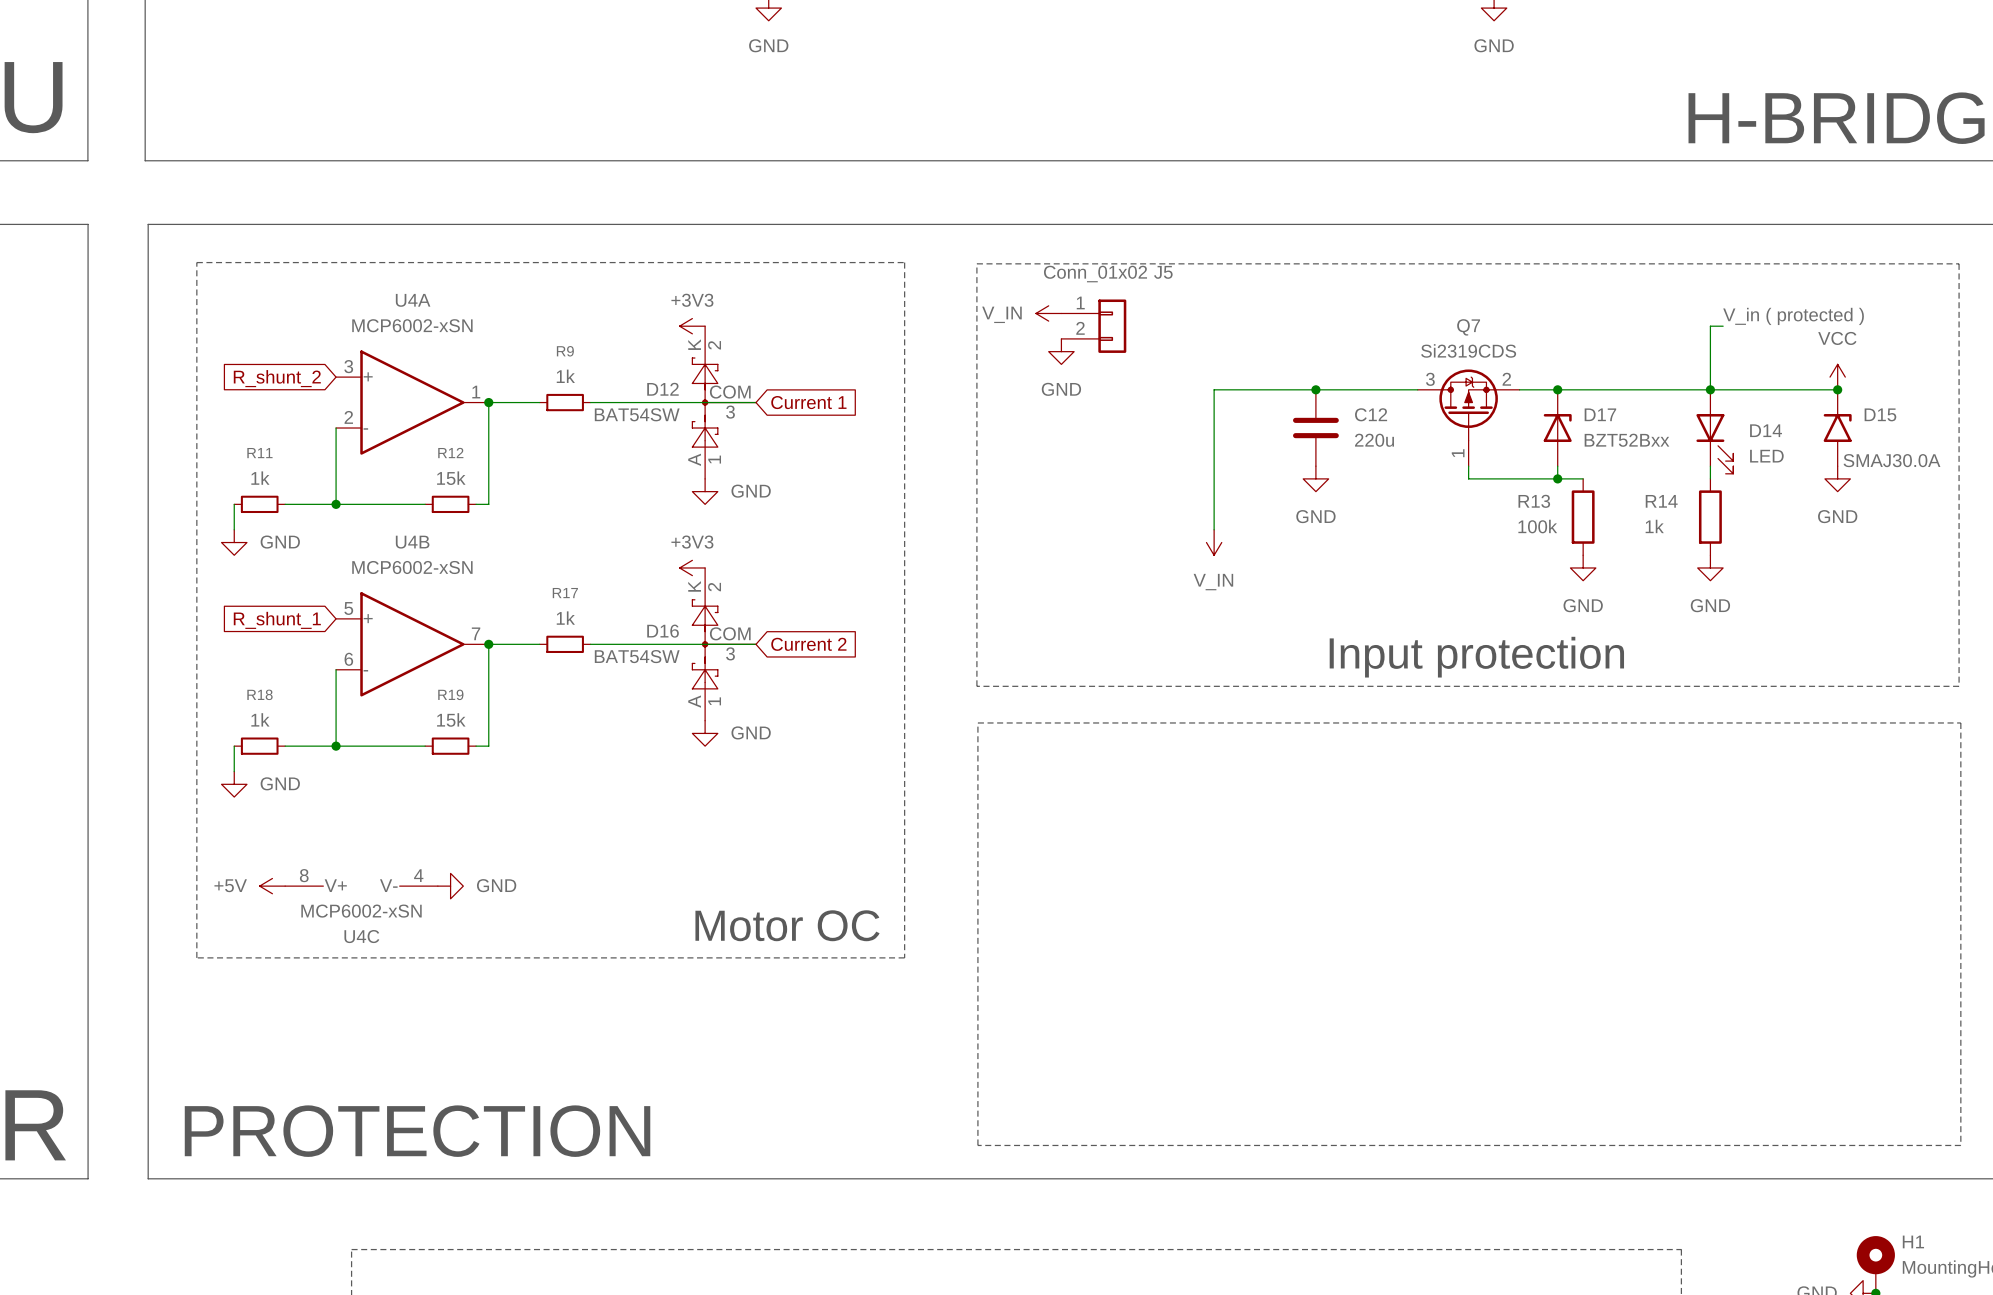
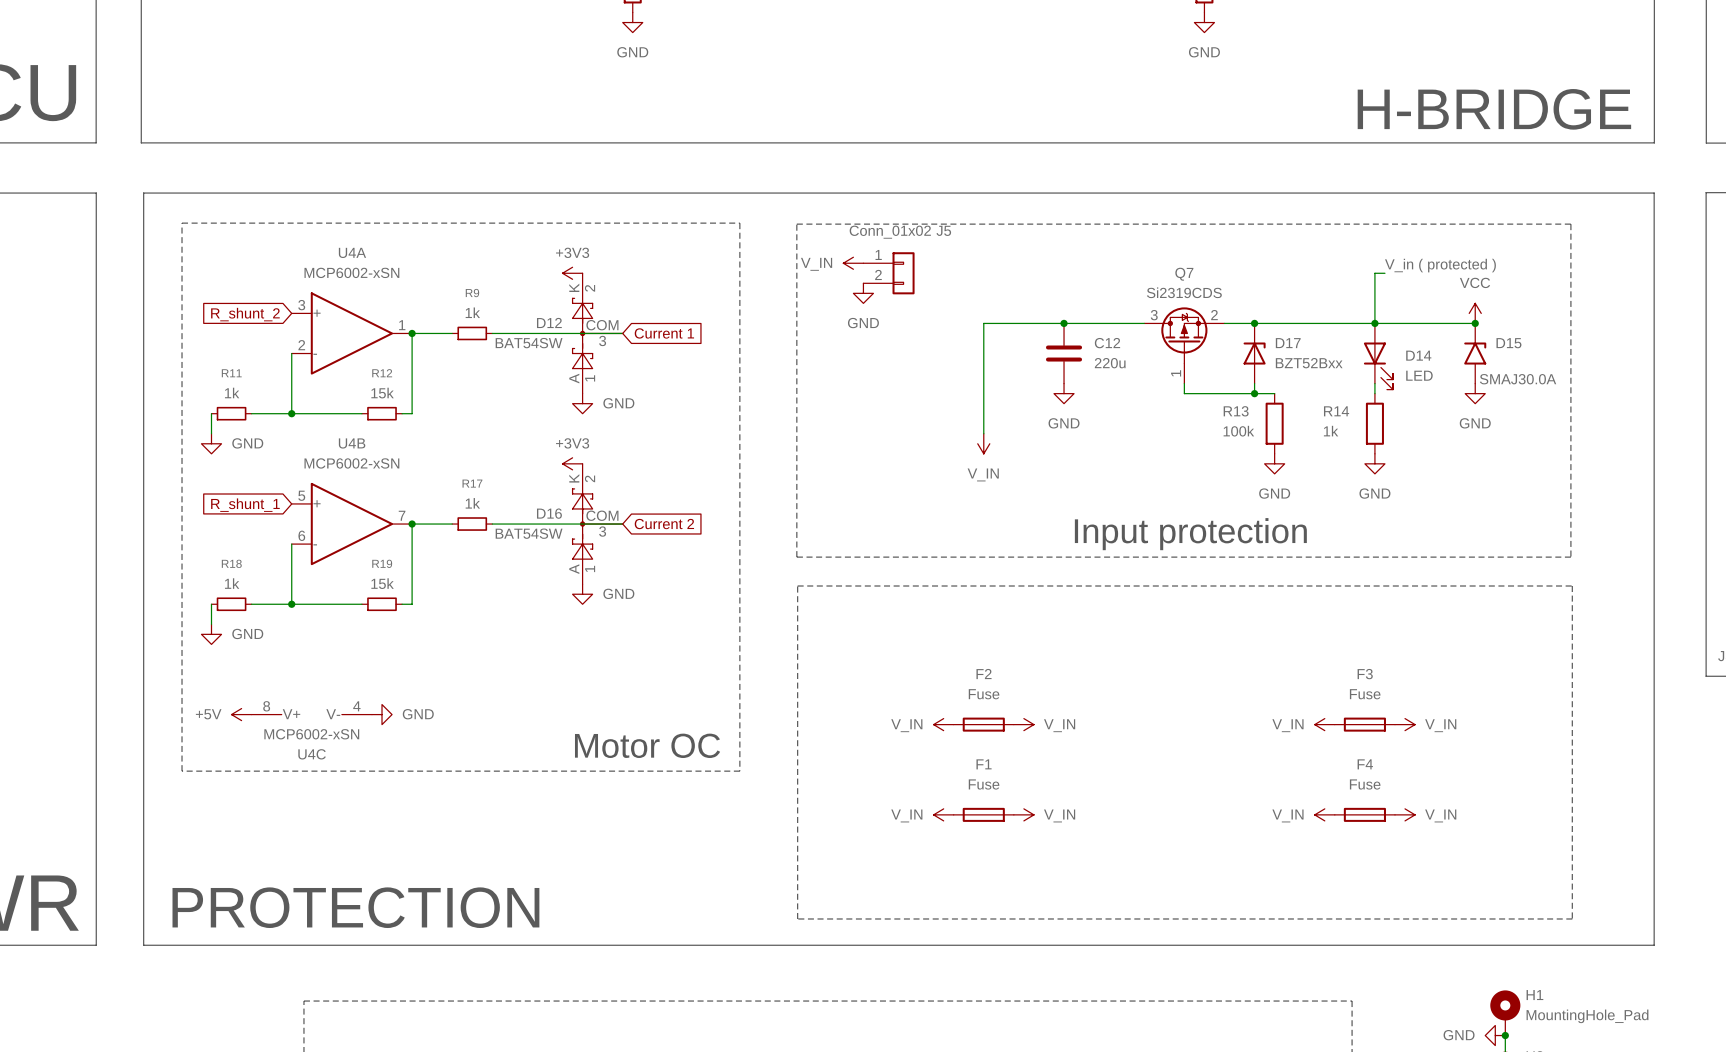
power symbol: none -> V_IN (943, 724)
F2: none -> Fuse (983, 724)
power symbol: none -> V_IN (1023, 724)
power symbol: none -> V_IN (1324, 724)
F3: none -> Fuse (1364, 724)
power symbol: none -> V_IN (1405, 724)
power symbol: none -> V_IN (943, 814)
F1: none -> Fuse (983, 814)
power symbol: none -> V_IN (1023, 814)
power symbol: none -> V_IN (1324, 814)
F4: none -> Fuse (1364, 814)
power symbol: none -> V_IN (1405, 814)

